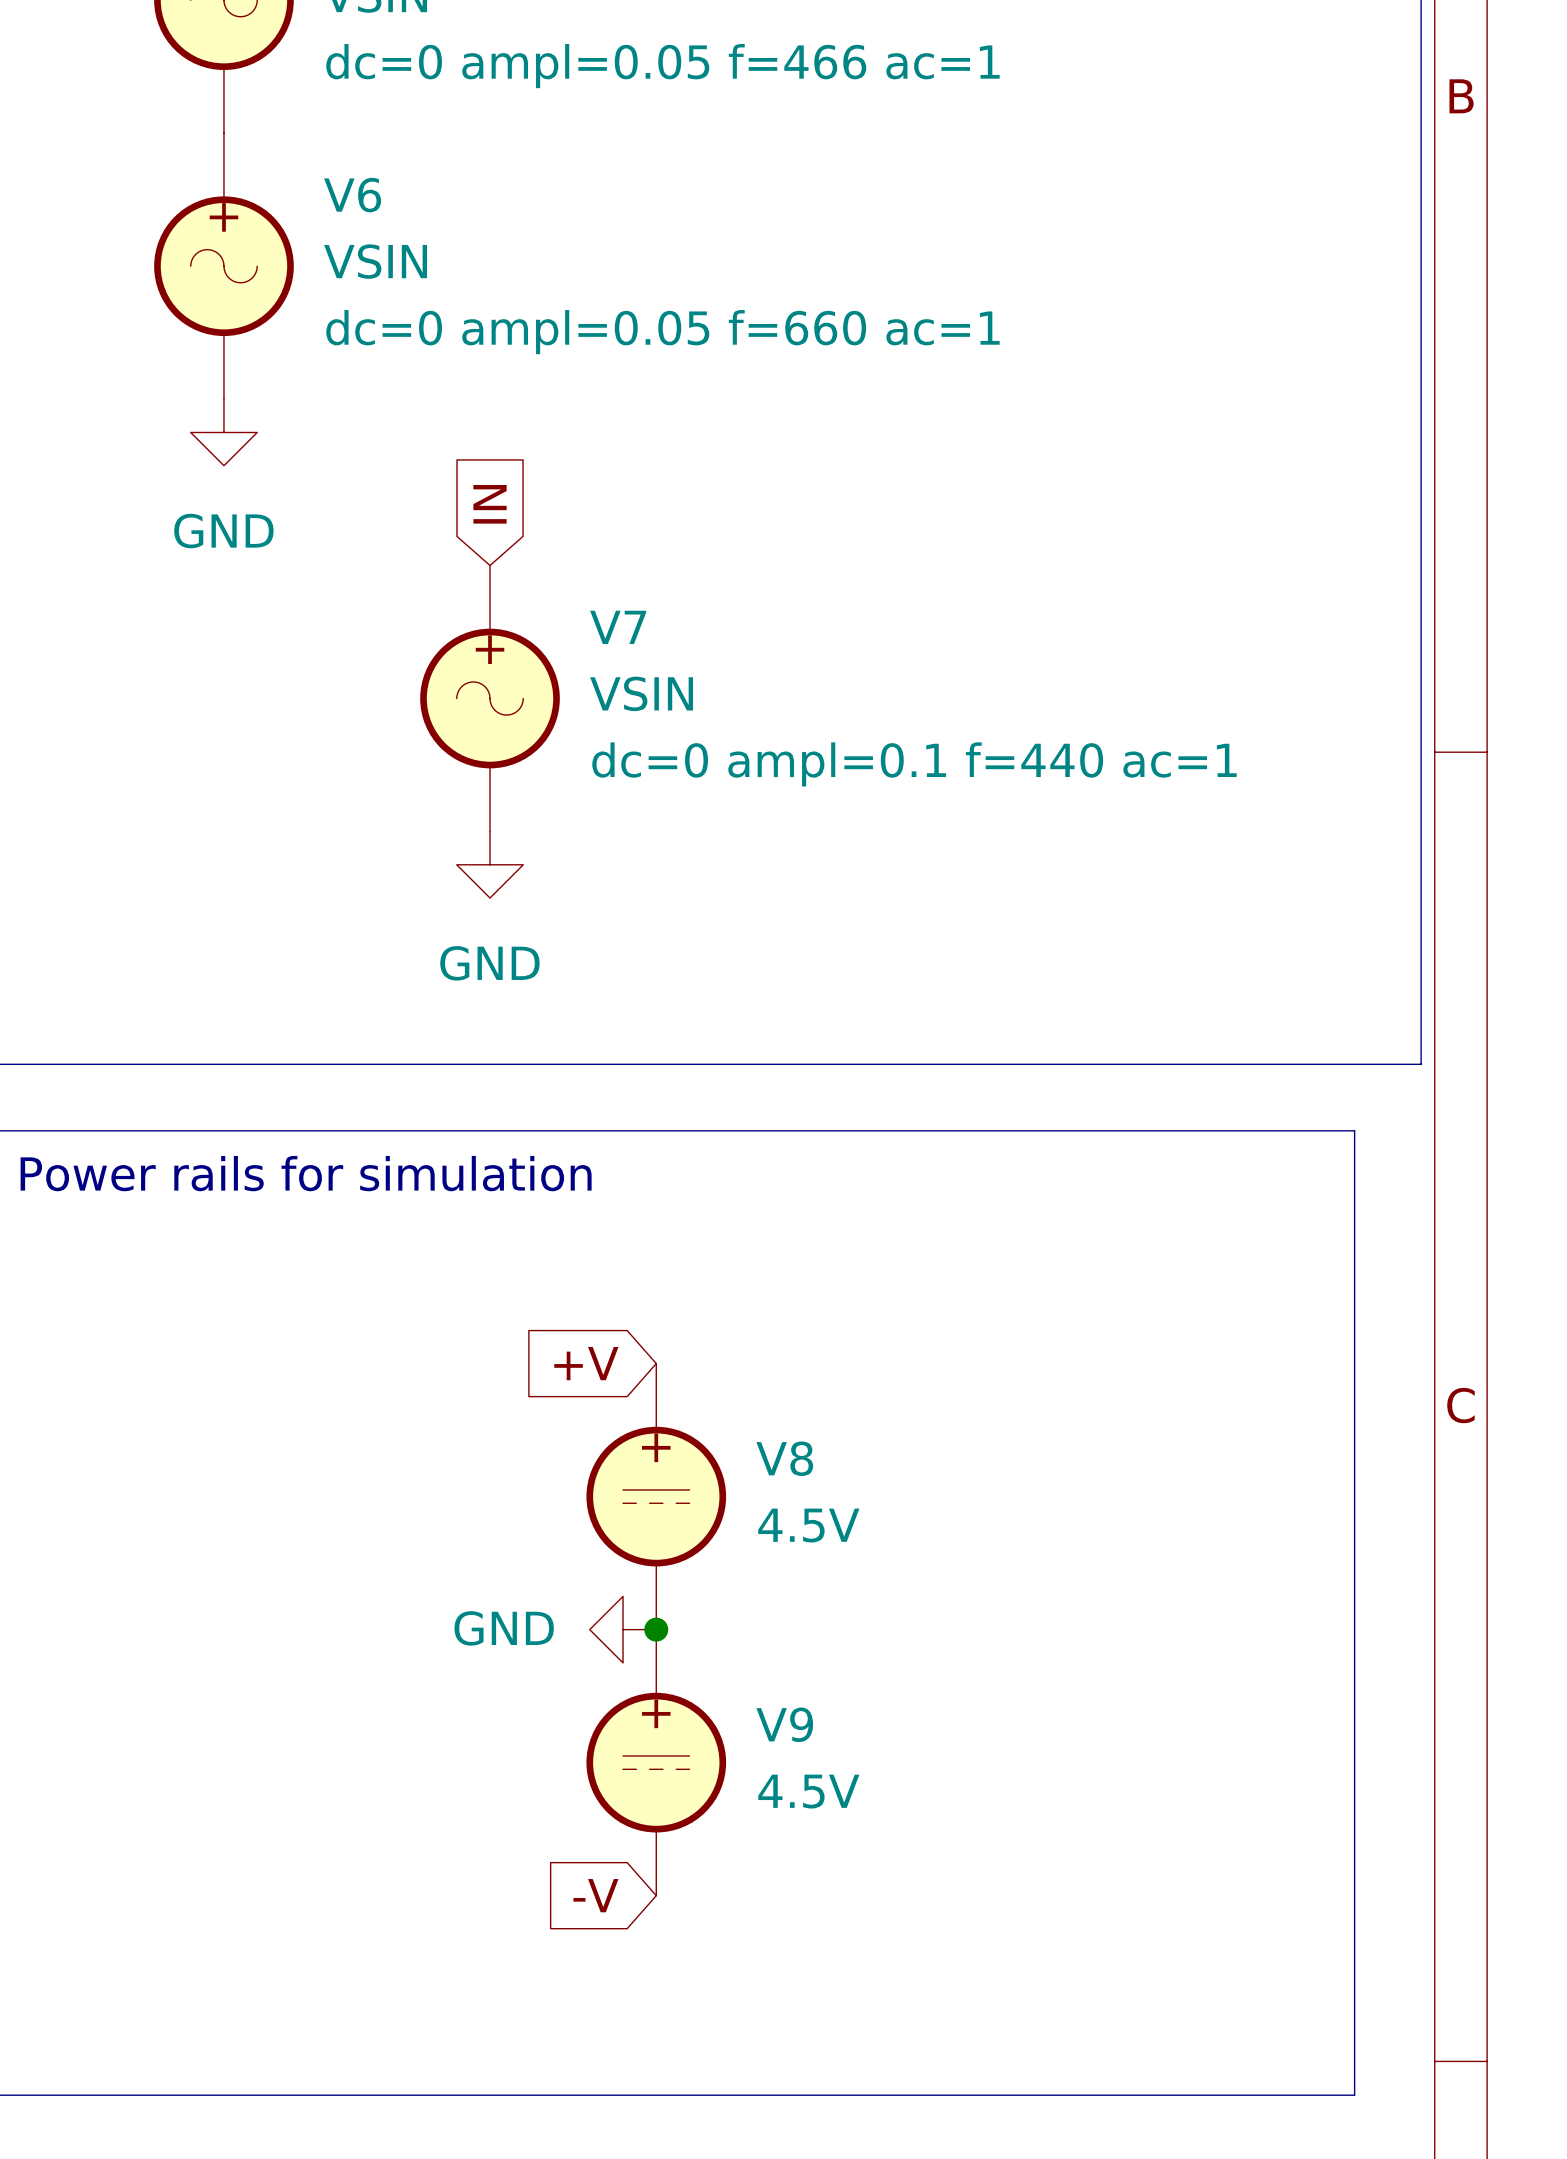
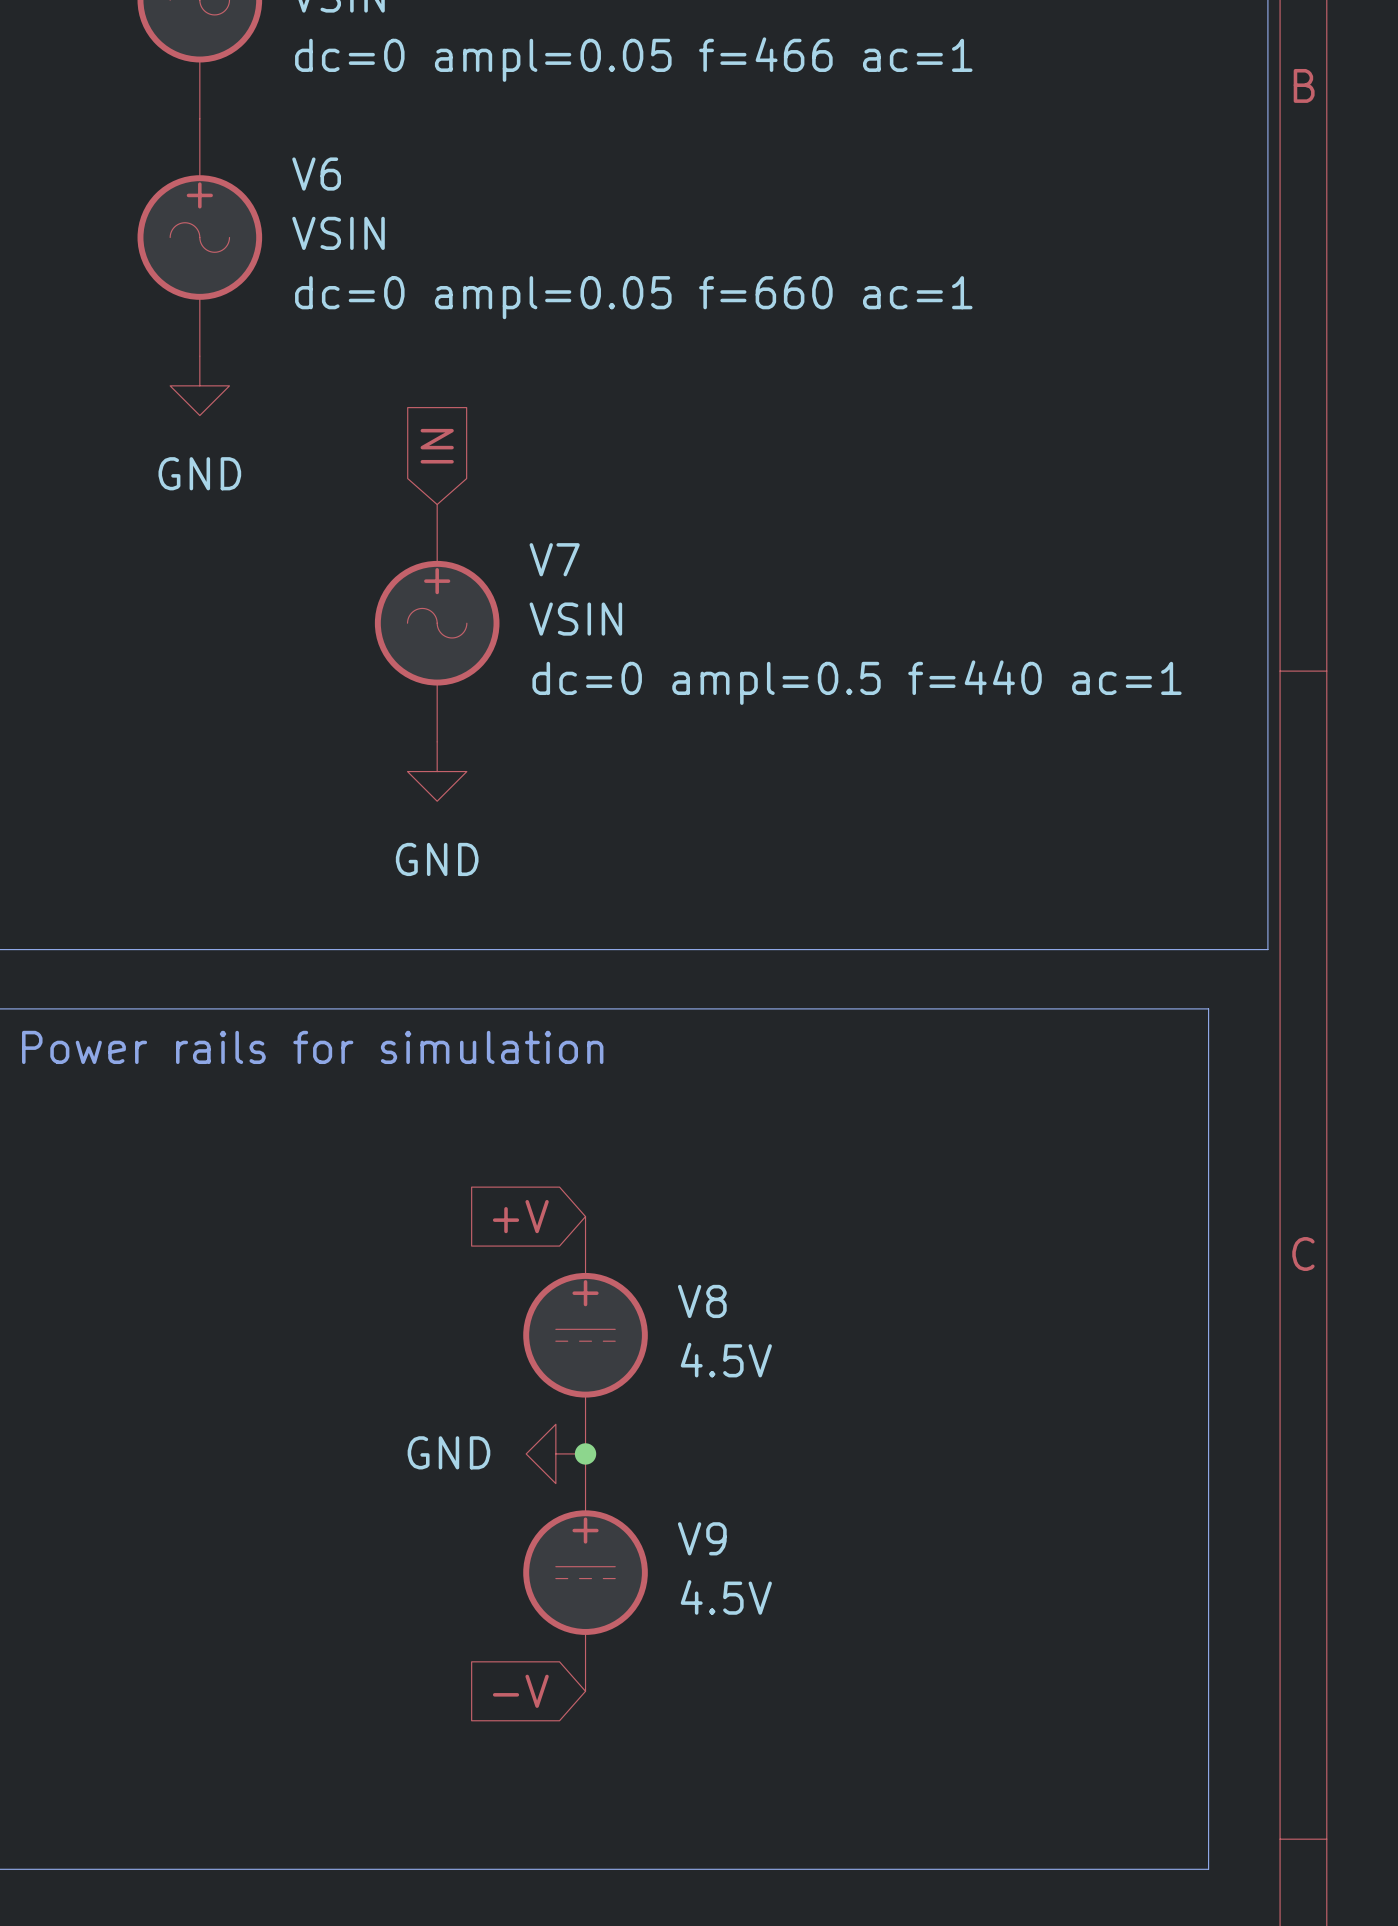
V7 text: dc=0 ampl=0.1 f=440 ac=1 (914, 764) -> dc=0 ampl=0.5 f=440 ac=1 (857, 682)

